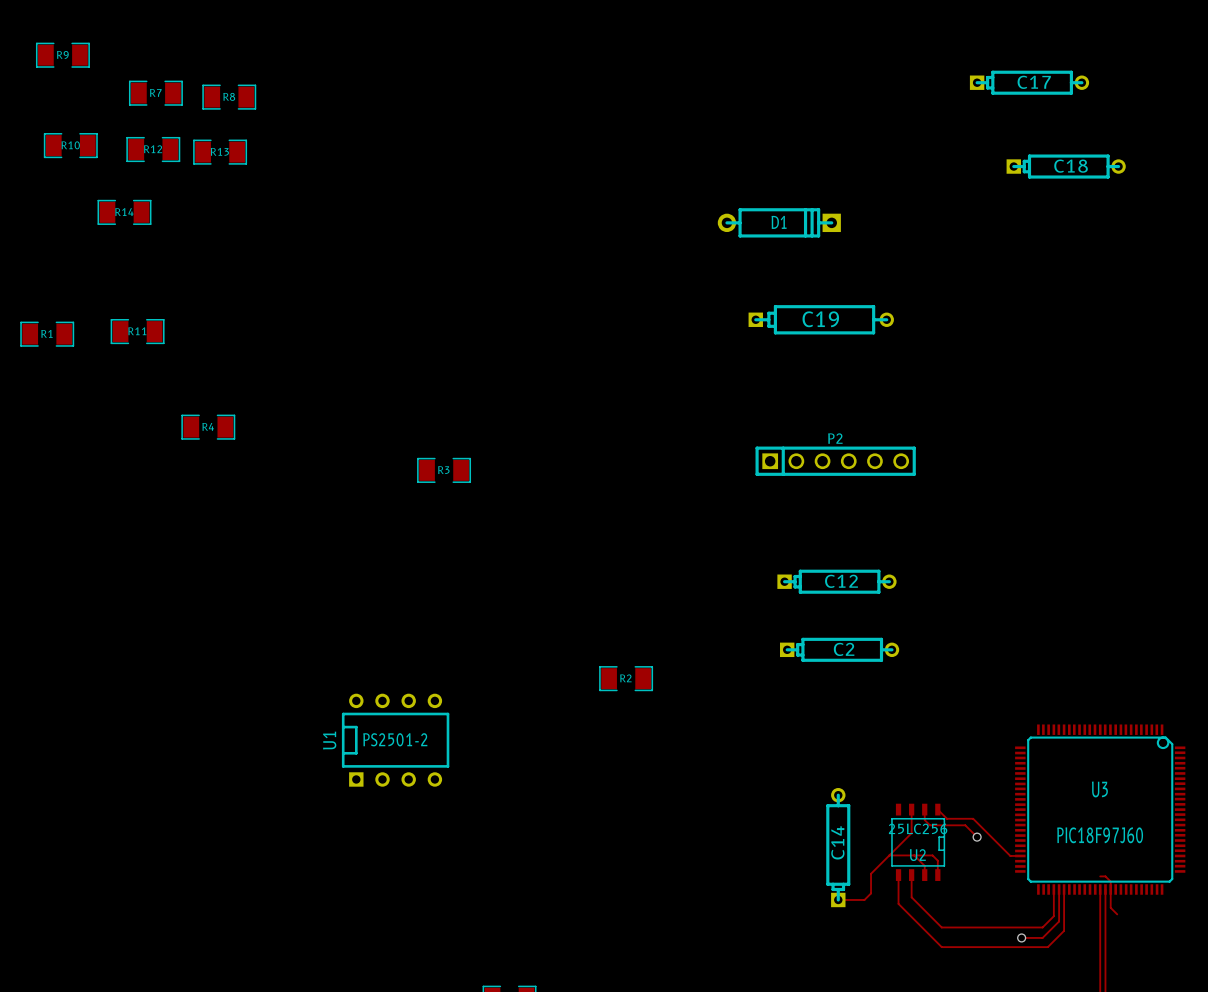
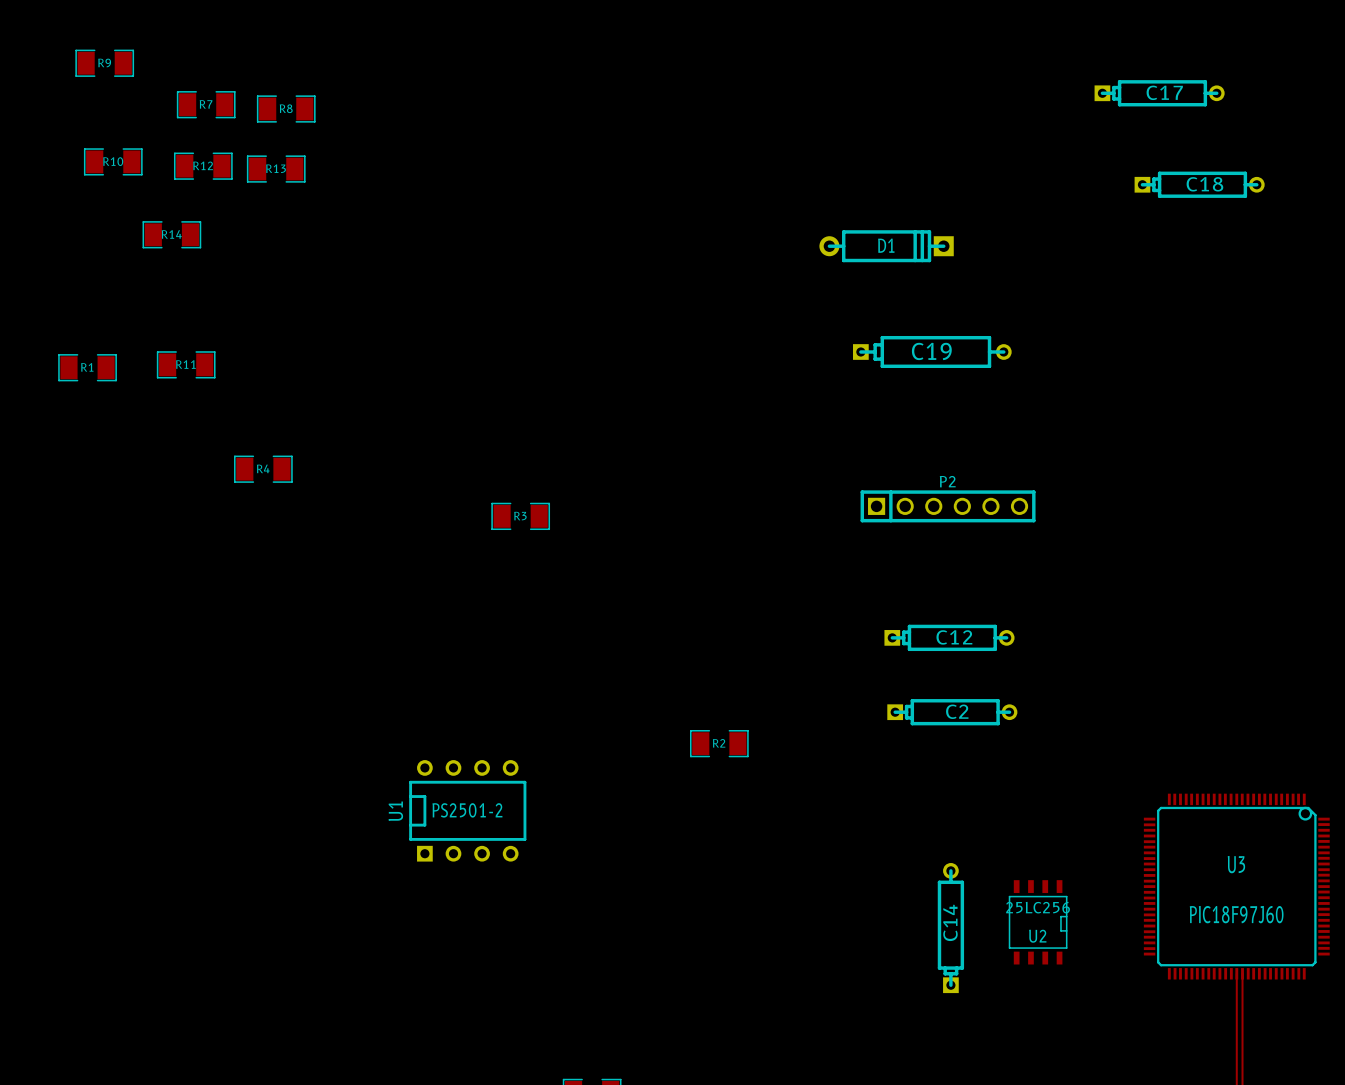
track: (911, 809) (911, 833) (871, 873) (871, 893) (864, 899) (838, 899) -> none
track: (924, 809) (924, 820) (929, 825) (965, 825) (977, 837) -> none
track: (937, 809) (946, 818) (973, 818) (1010, 855) (1020, 855) -> none
via: (977, 837) -> none
track: (889, 855) (932, 855) (937, 860) (937, 875) -> none
track: (914, 855) (924, 865) (924, 875) -> none
track: (898, 875) (898, 903) (941, 947) (1047, 947) (1064, 930) (1064, 889) -> none
track: (911, 875) (911, 897) (941, 927) (1042, 927) (1053, 916) (1053, 889) -> none
track: (1100, 876) (1105, 876) (1110, 881) (1110, 907) (1117, 914) -> none
track: (1059, 889) (1059, 921) (1042, 937) (1021, 937) -> none
via: (1021, 937) -> none

